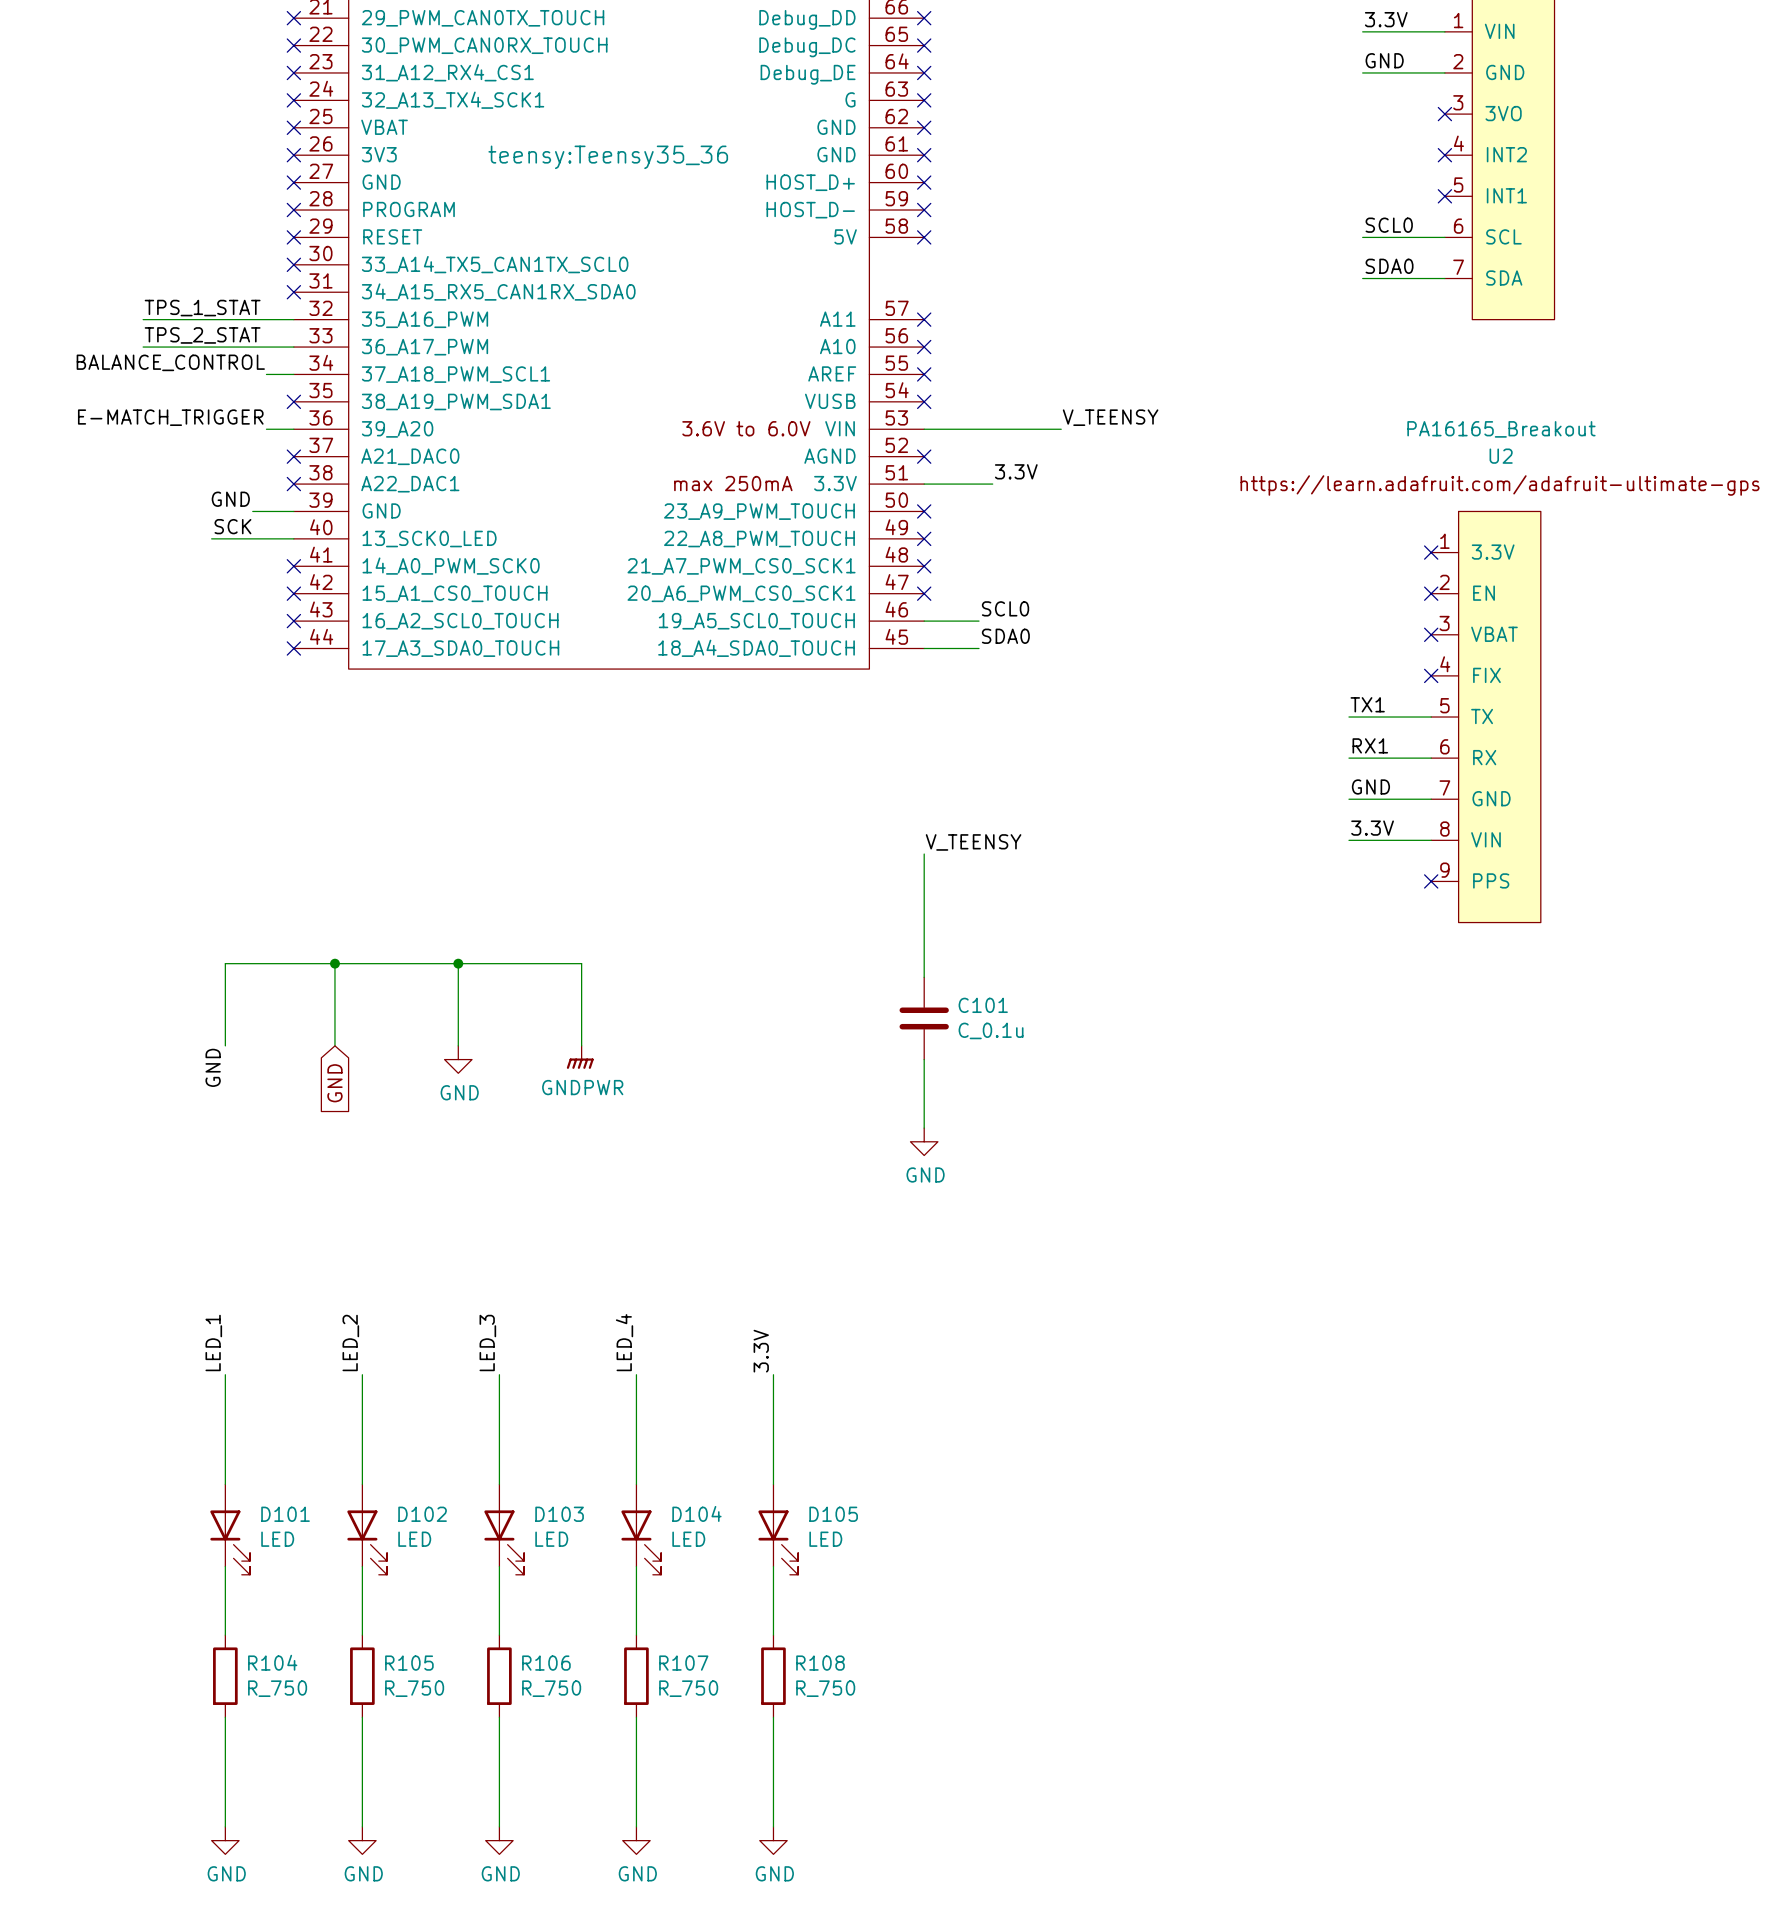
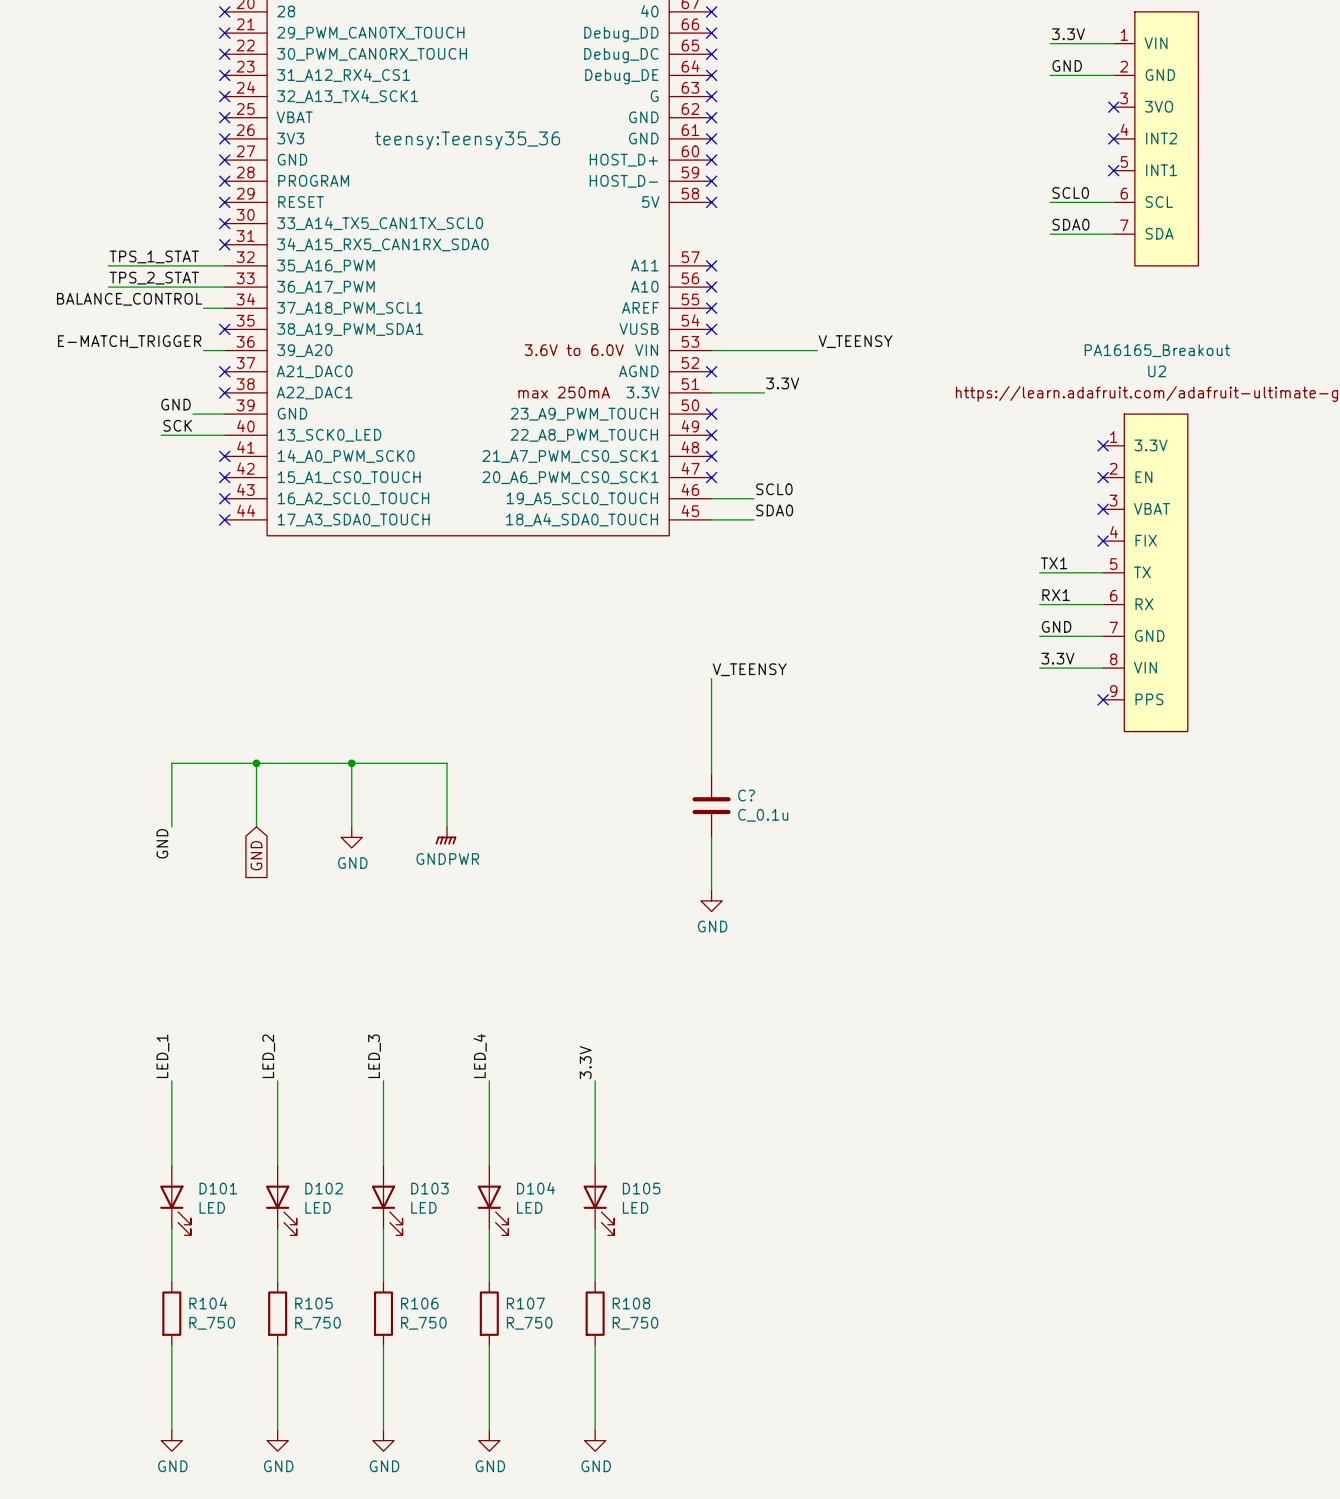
C101 name: C101 (983, 1005) -> C? (746, 795)

